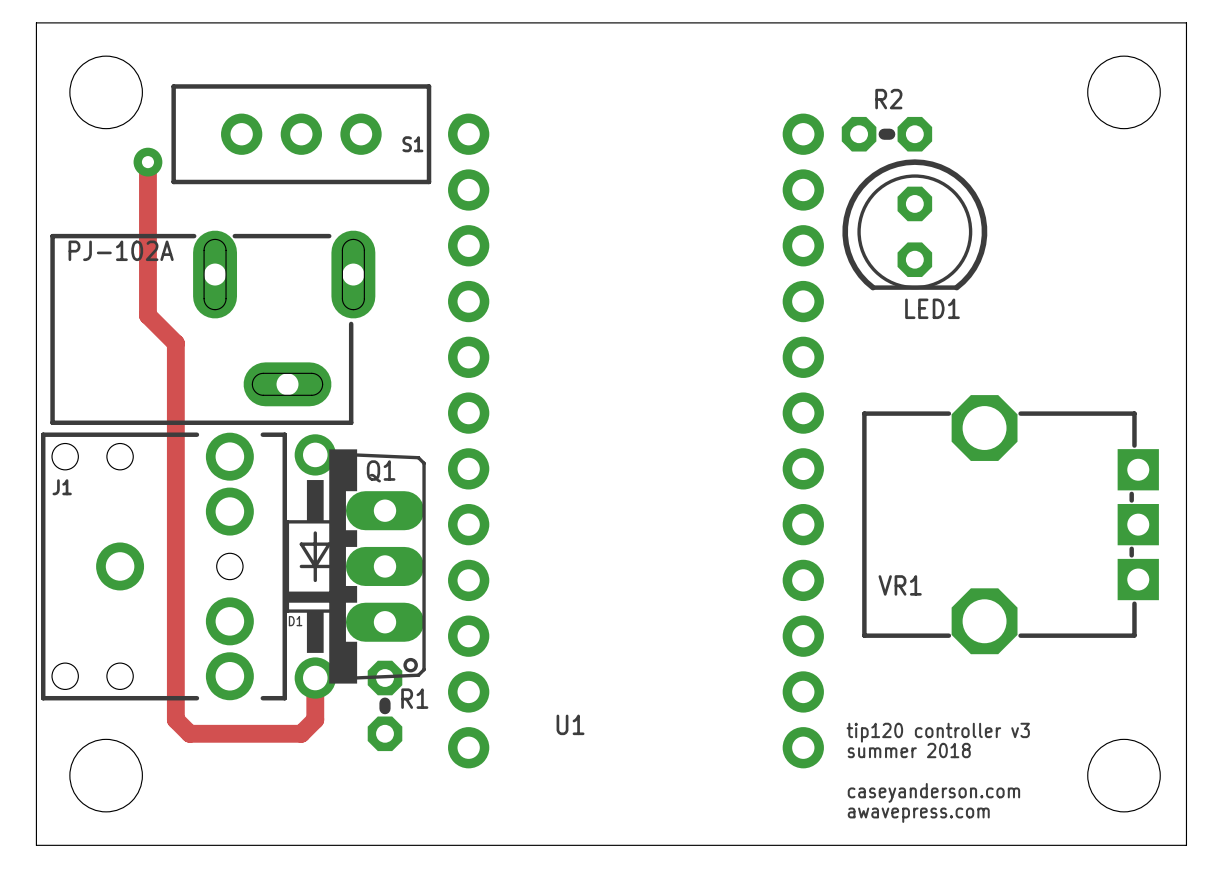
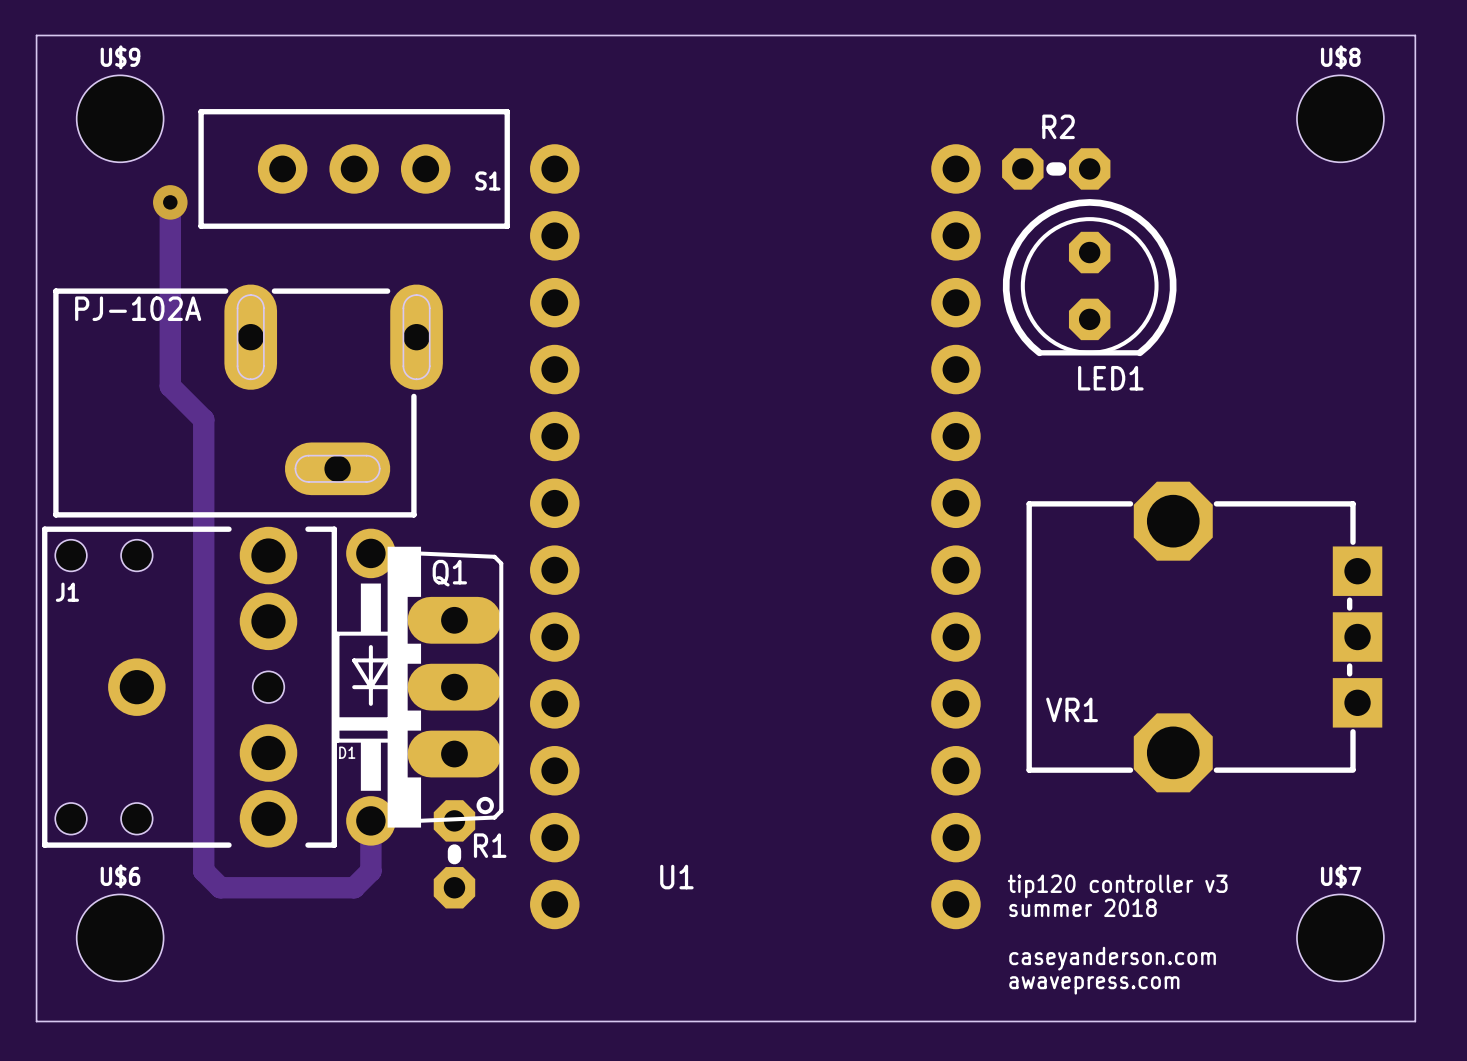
U$9 name: none -> U$9 (120, 57)
U$8 name: none -> U$8 (1340, 57)
U$6 name: none -> U$6 (120, 876)
U$7 name: none -> U$7 (1341, 876)

